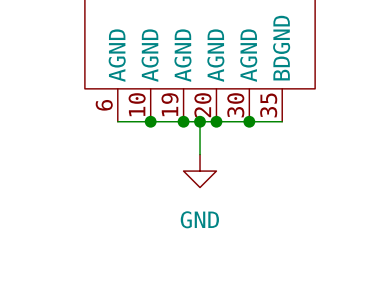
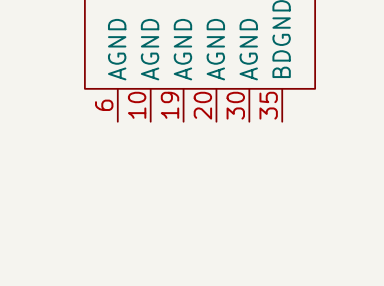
wire: (117, 121) (282, 121) -> none
junction: (150, 121) -> none
junction: (183, 121) -> none
wire: (200, 121) (200, 154) -> none
junction: (200, 121) -> none
junction: (216, 121) -> none
junction: (249, 121) -> none
power symbol: GND (200, 171) -> none

